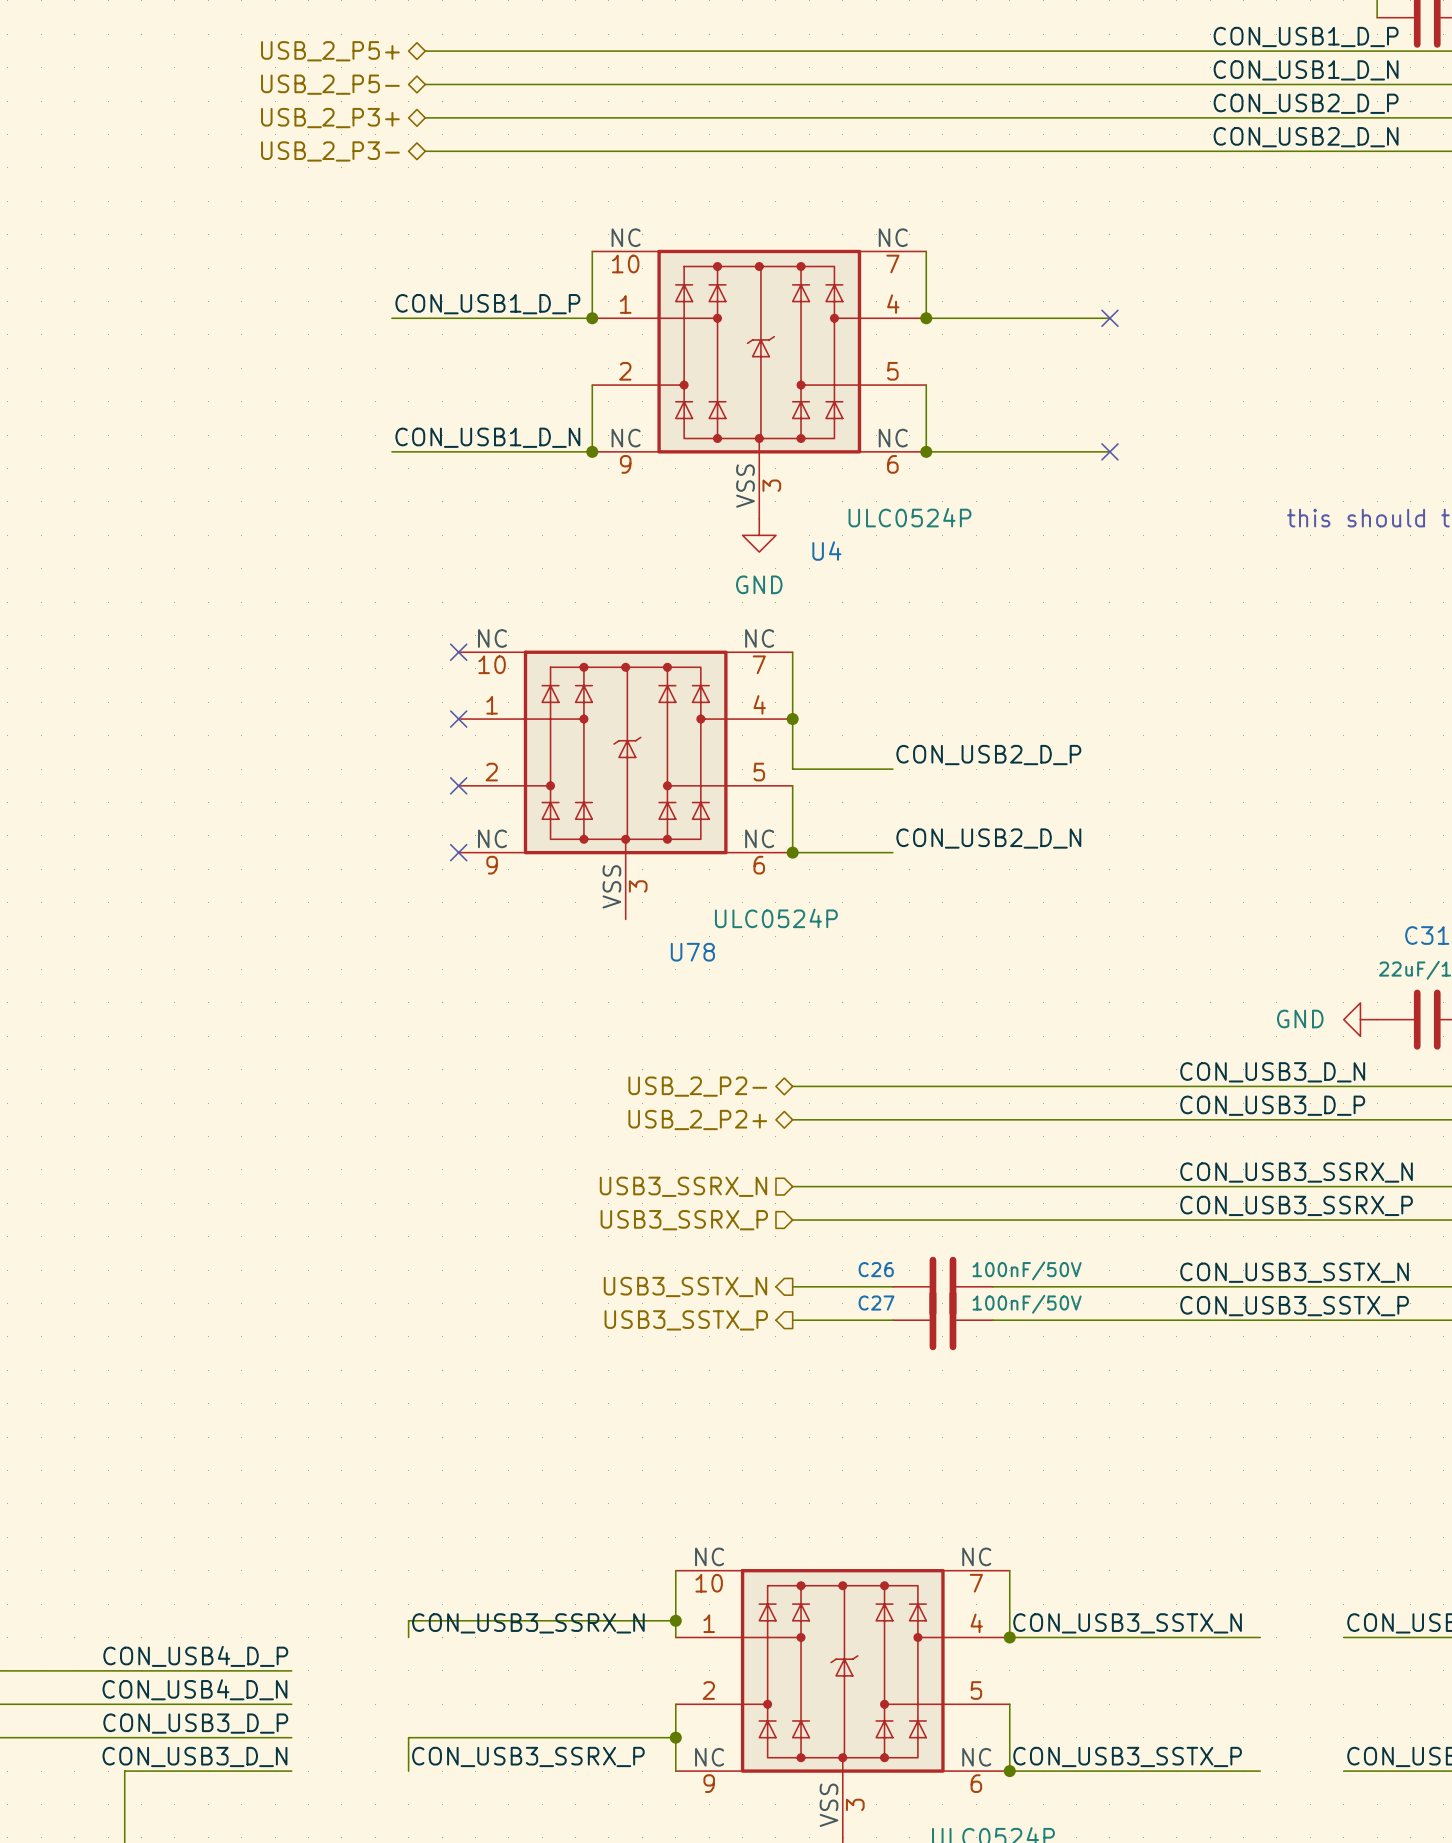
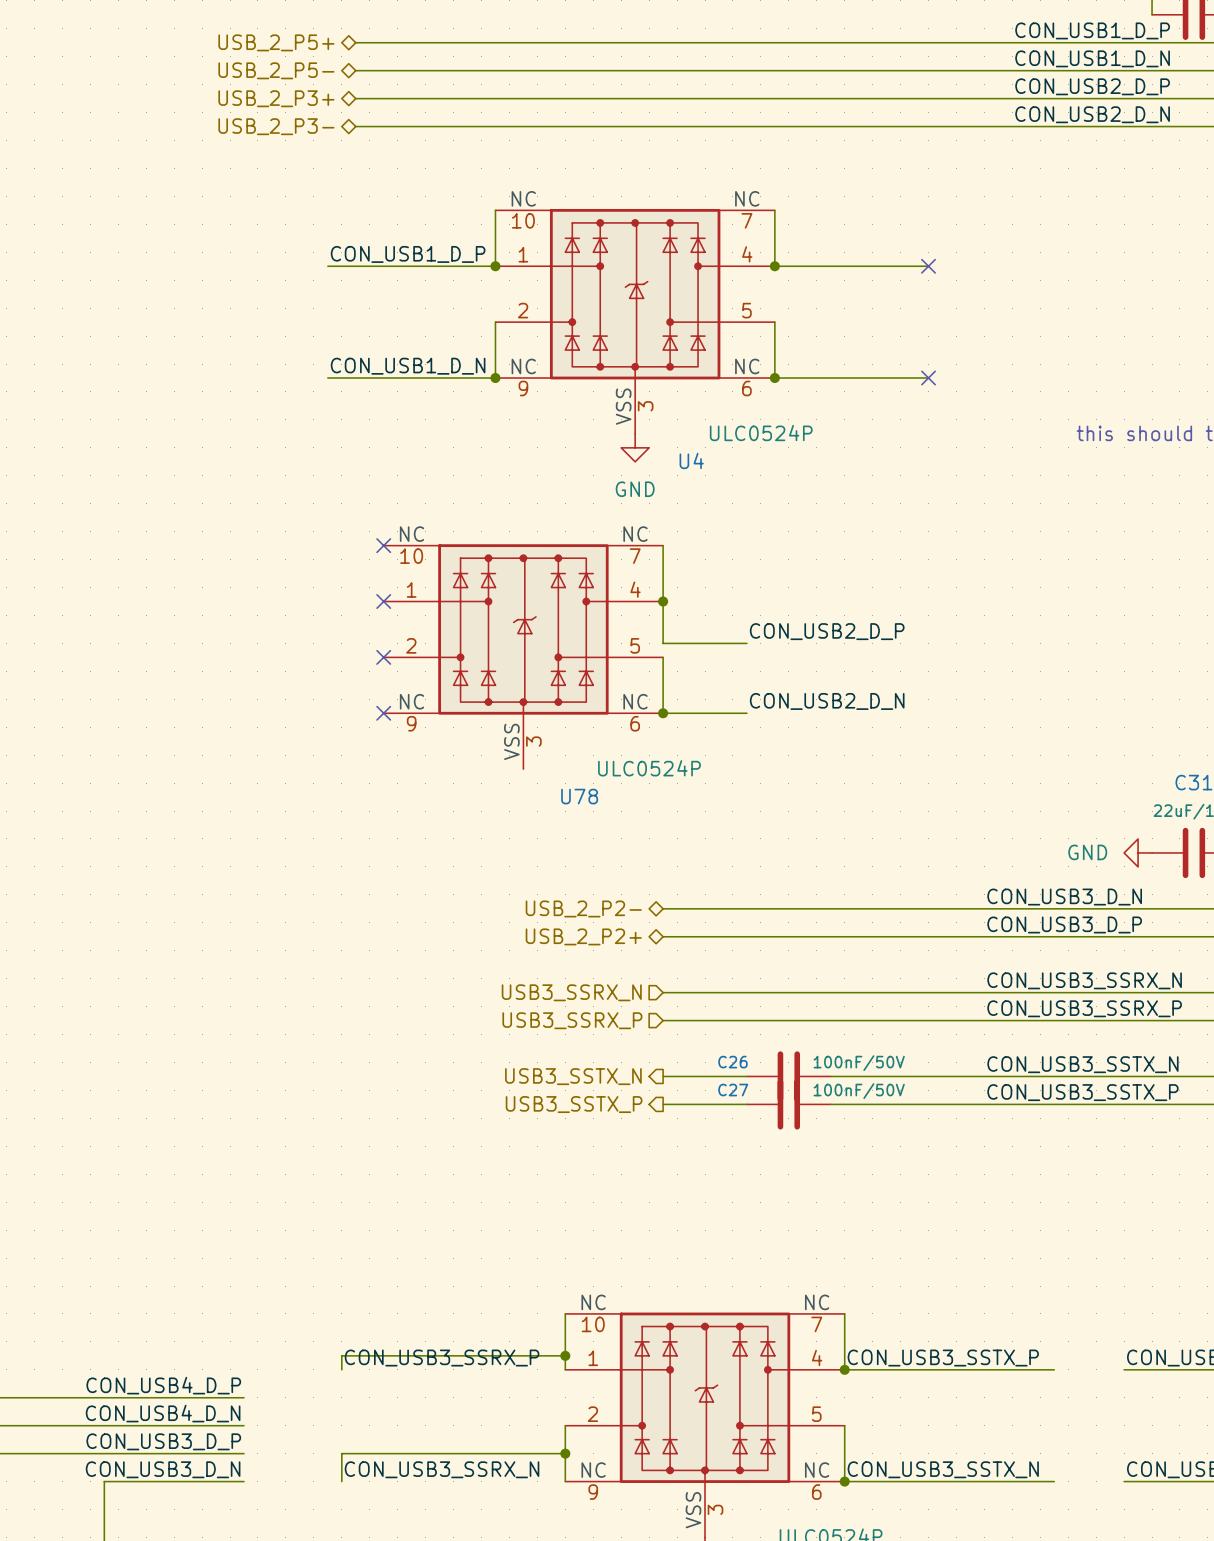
label: CON_USB3_SSRX_N (528, 1623) -> CON_USB3_SSRX_P (442, 1358)
label: CON_USB3_SSTX_N (1127, 1623) -> CON_USB3_SSTX_P (943, 1358)
label: CON_USB3_SSRX_P (528, 1756) -> CON_USB3_SSRX_N (442, 1469)
label: CON_USB3_SSTX_P (1127, 1756) -> CON_USB3_SSTX_N (943, 1469)

